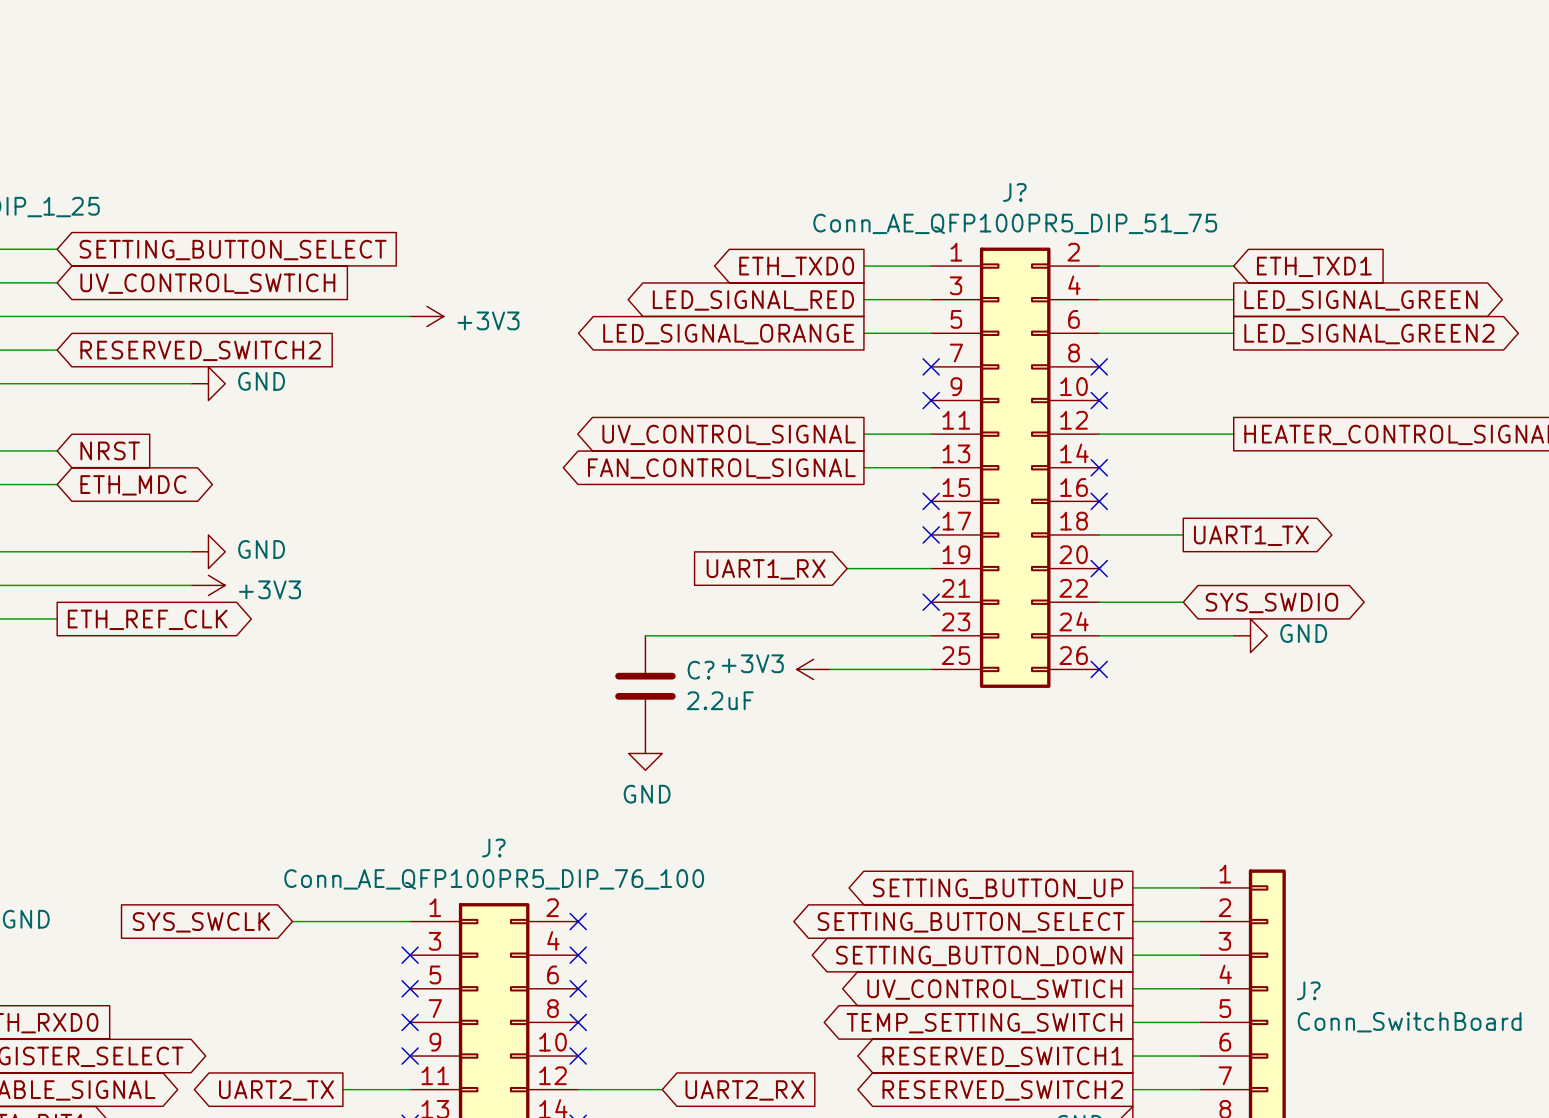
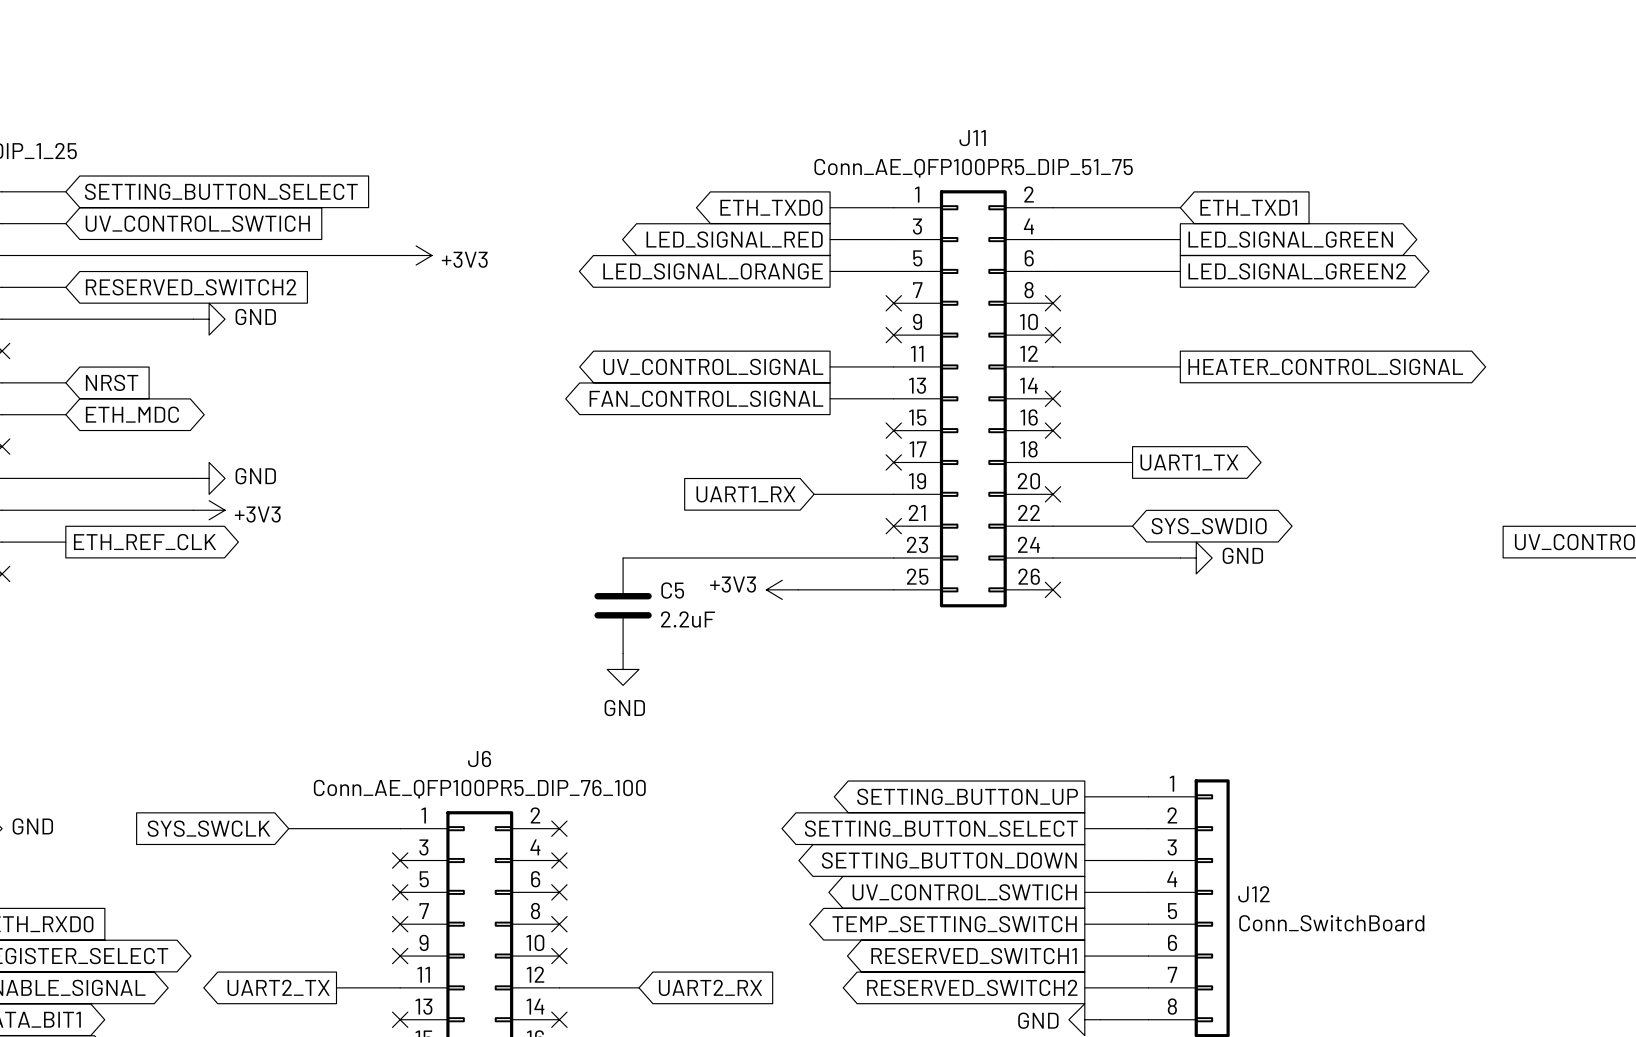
J? name: J? (1014, 192) -> J11 (972, 138)
C? name: C? (701, 670) -> C5 (672, 590)
J? name: J? (493, 847) -> J6 (479, 758)
J? name: J? (1308, 990) -> J12 (1253, 894)

